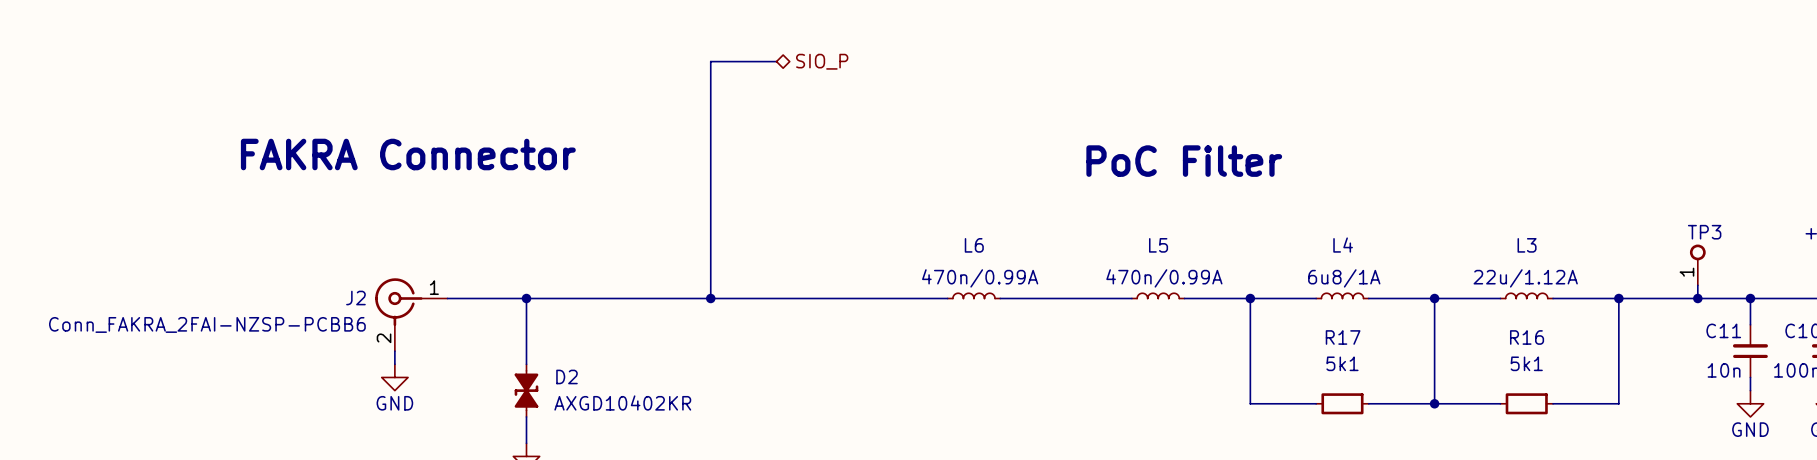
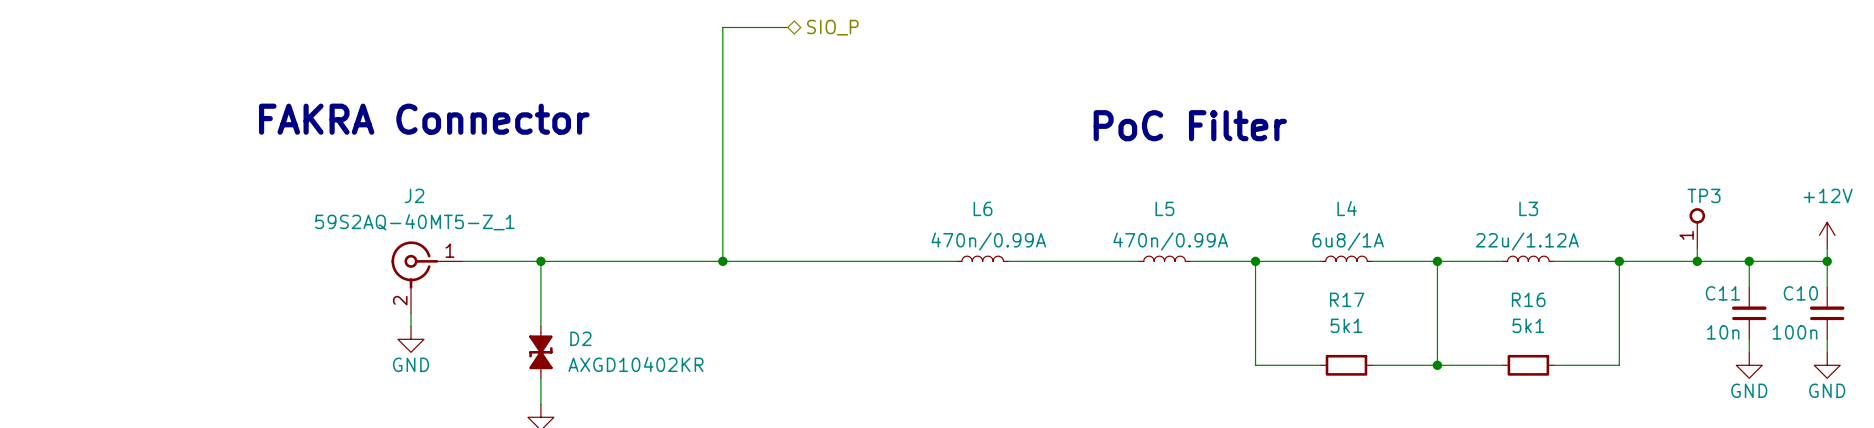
J2 text: none -> 59S2AQ-40MT5-Z_1 (414, 222)
J2 name position: J2 (355, 298) -> J2 (414, 195)
J2 value: Conn_FAKRA_2FAI-NZSP-PCBB6 (207, 324) -> none

